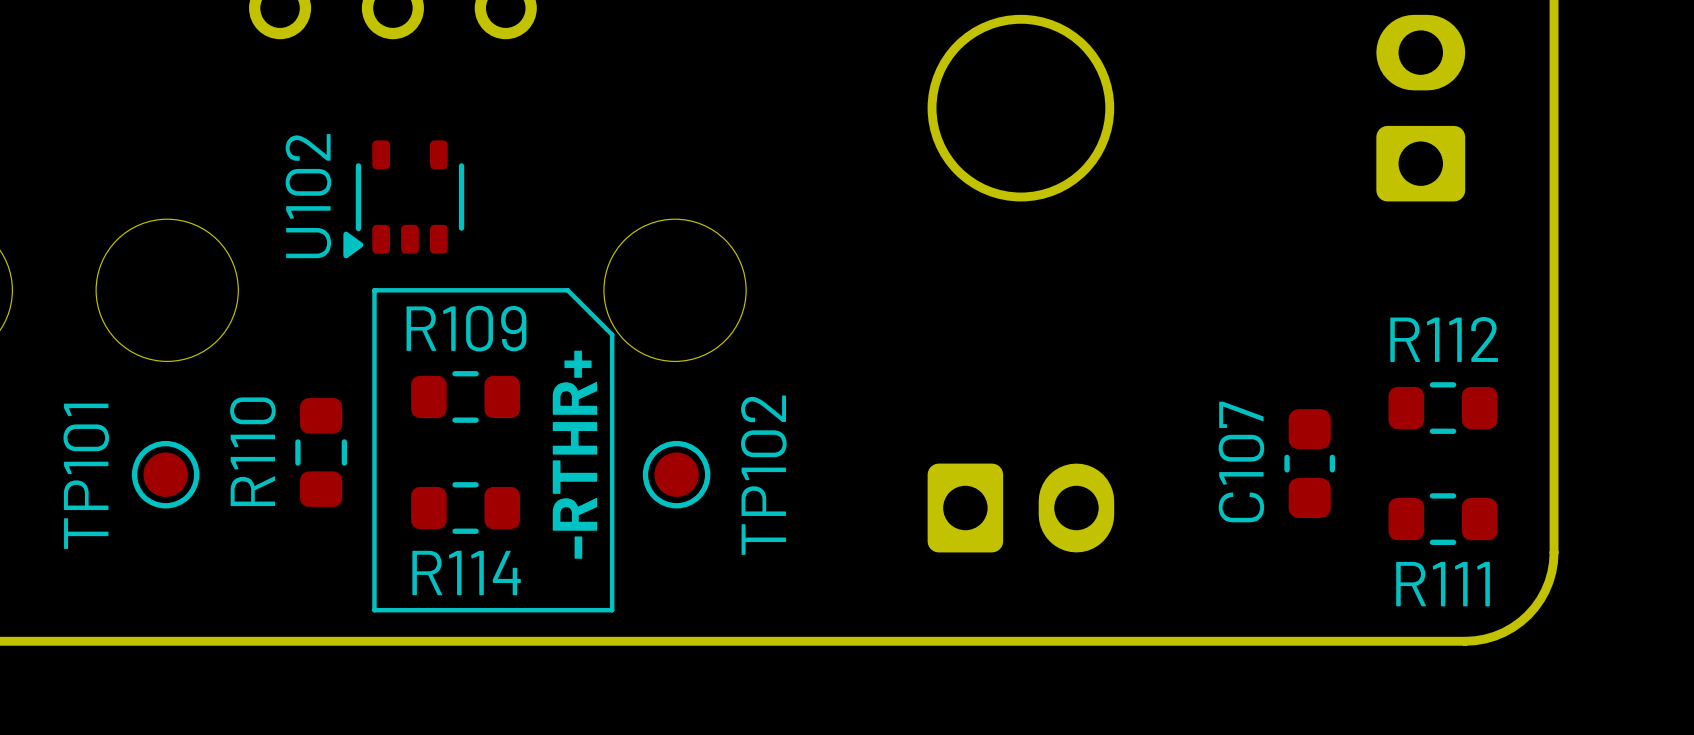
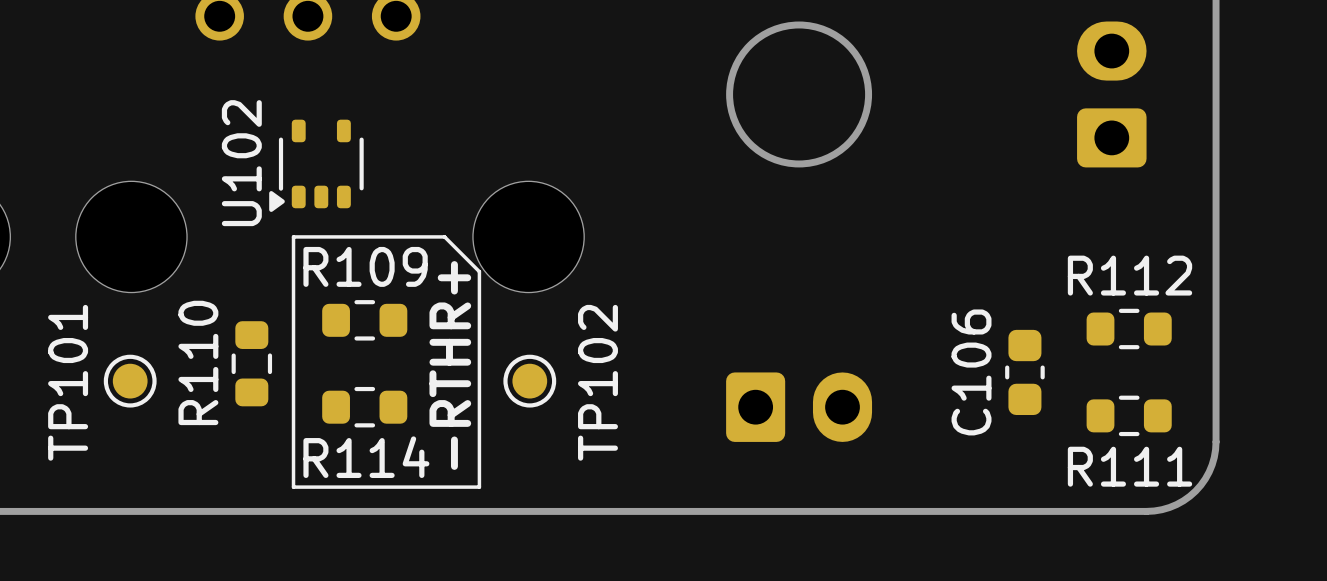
C107 name: C107 (1241, 461) -> C106 (971, 372)

